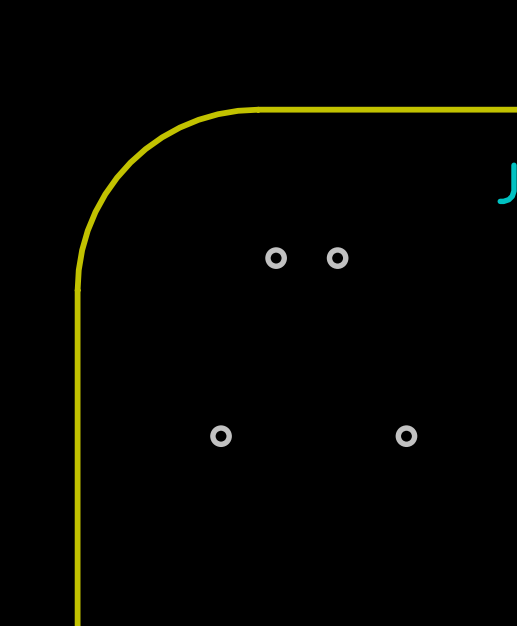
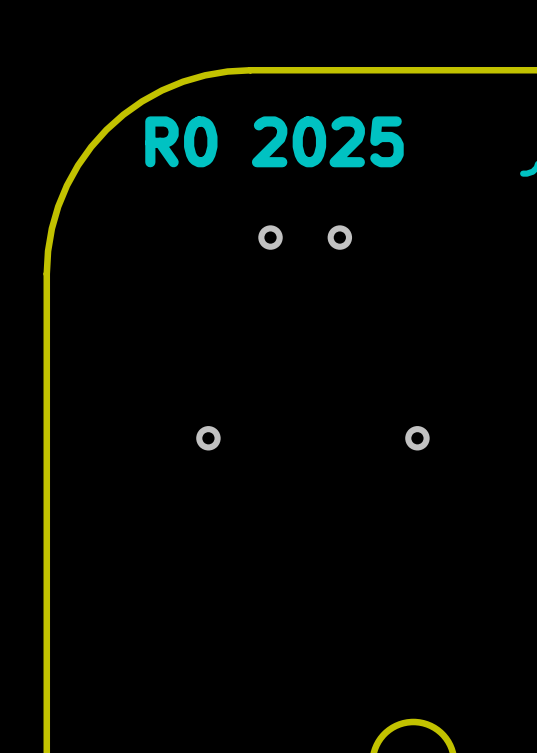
text: none -> R0 2025 (274, 141)

